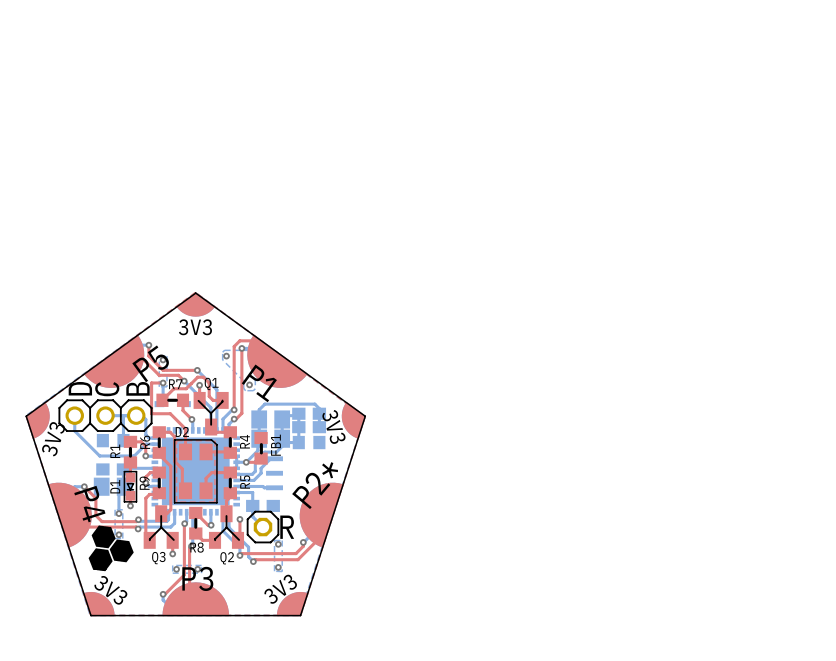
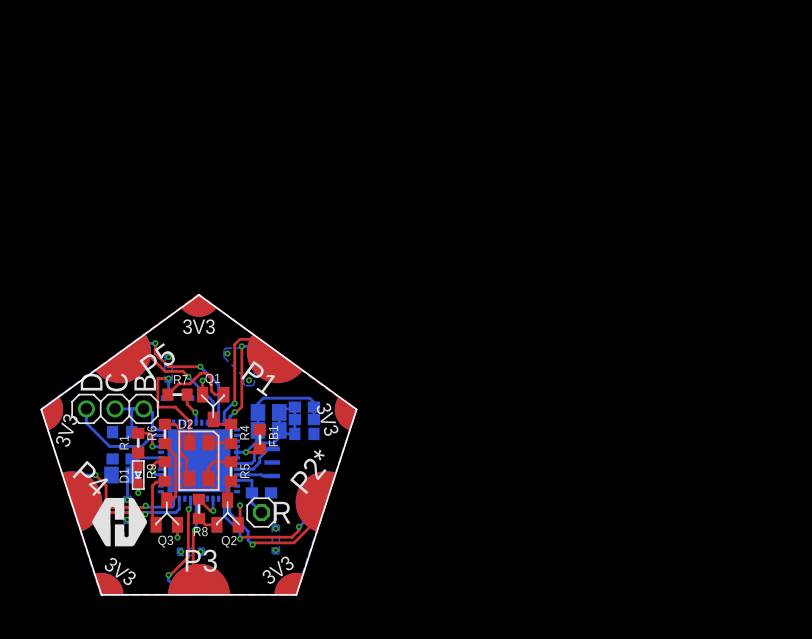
text rotation: 0° (89, 504) -> 30° counterclockwise (90, 478)
drawing: none -> [92, 497, 148, 547]
drawing: [88, 525, 134, 572] -> none

